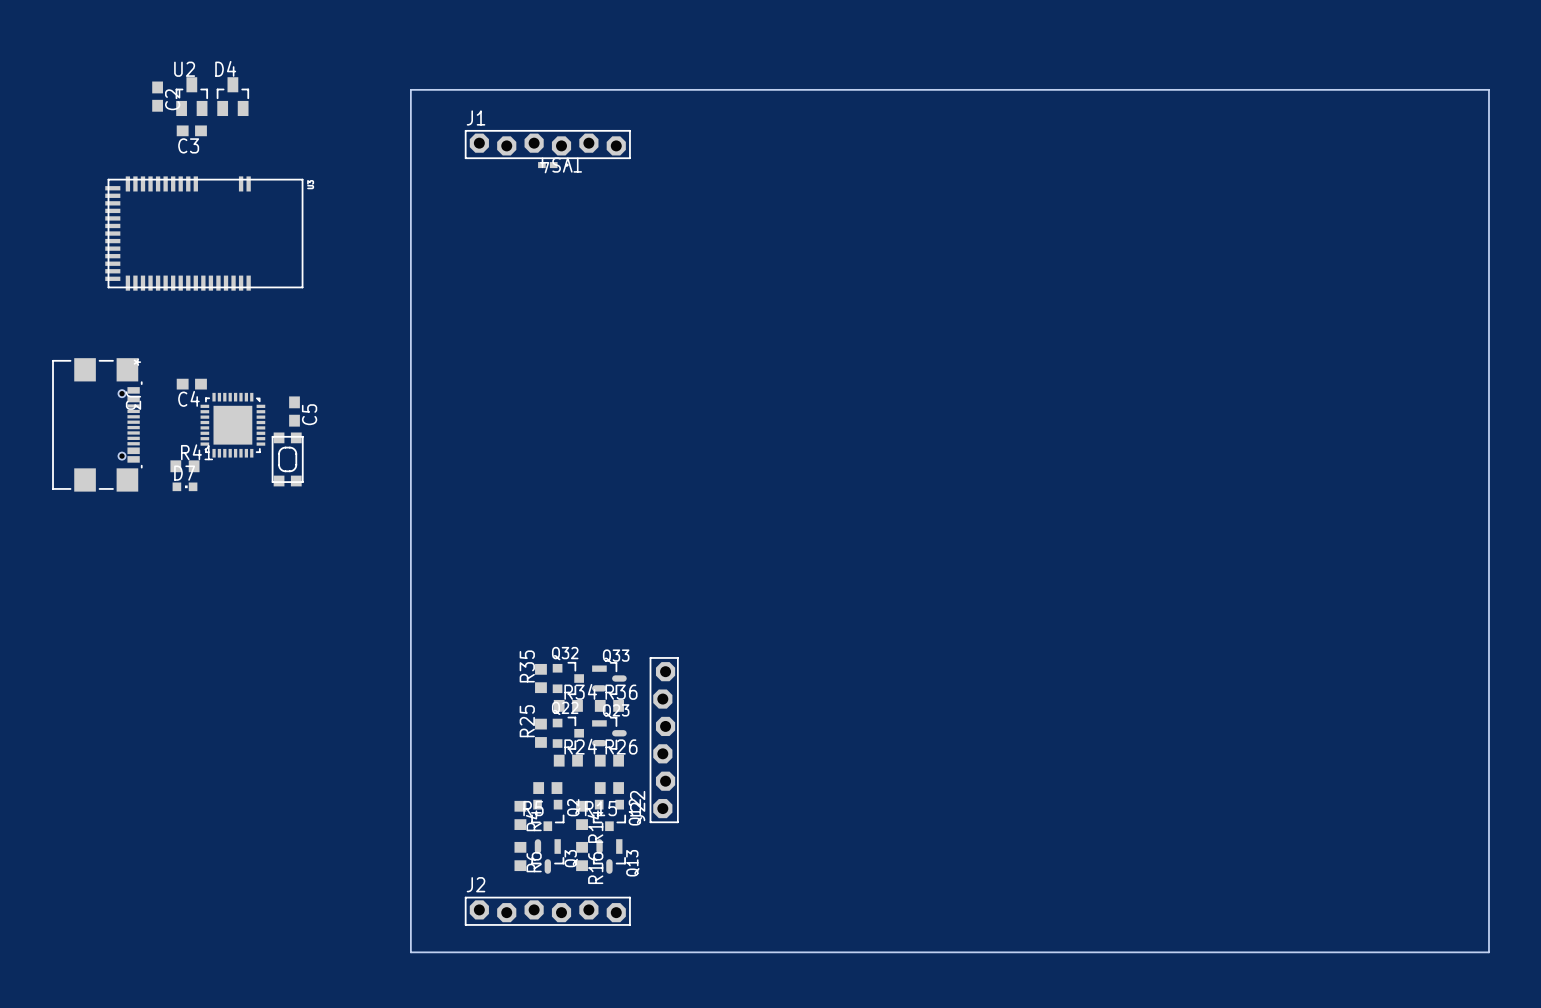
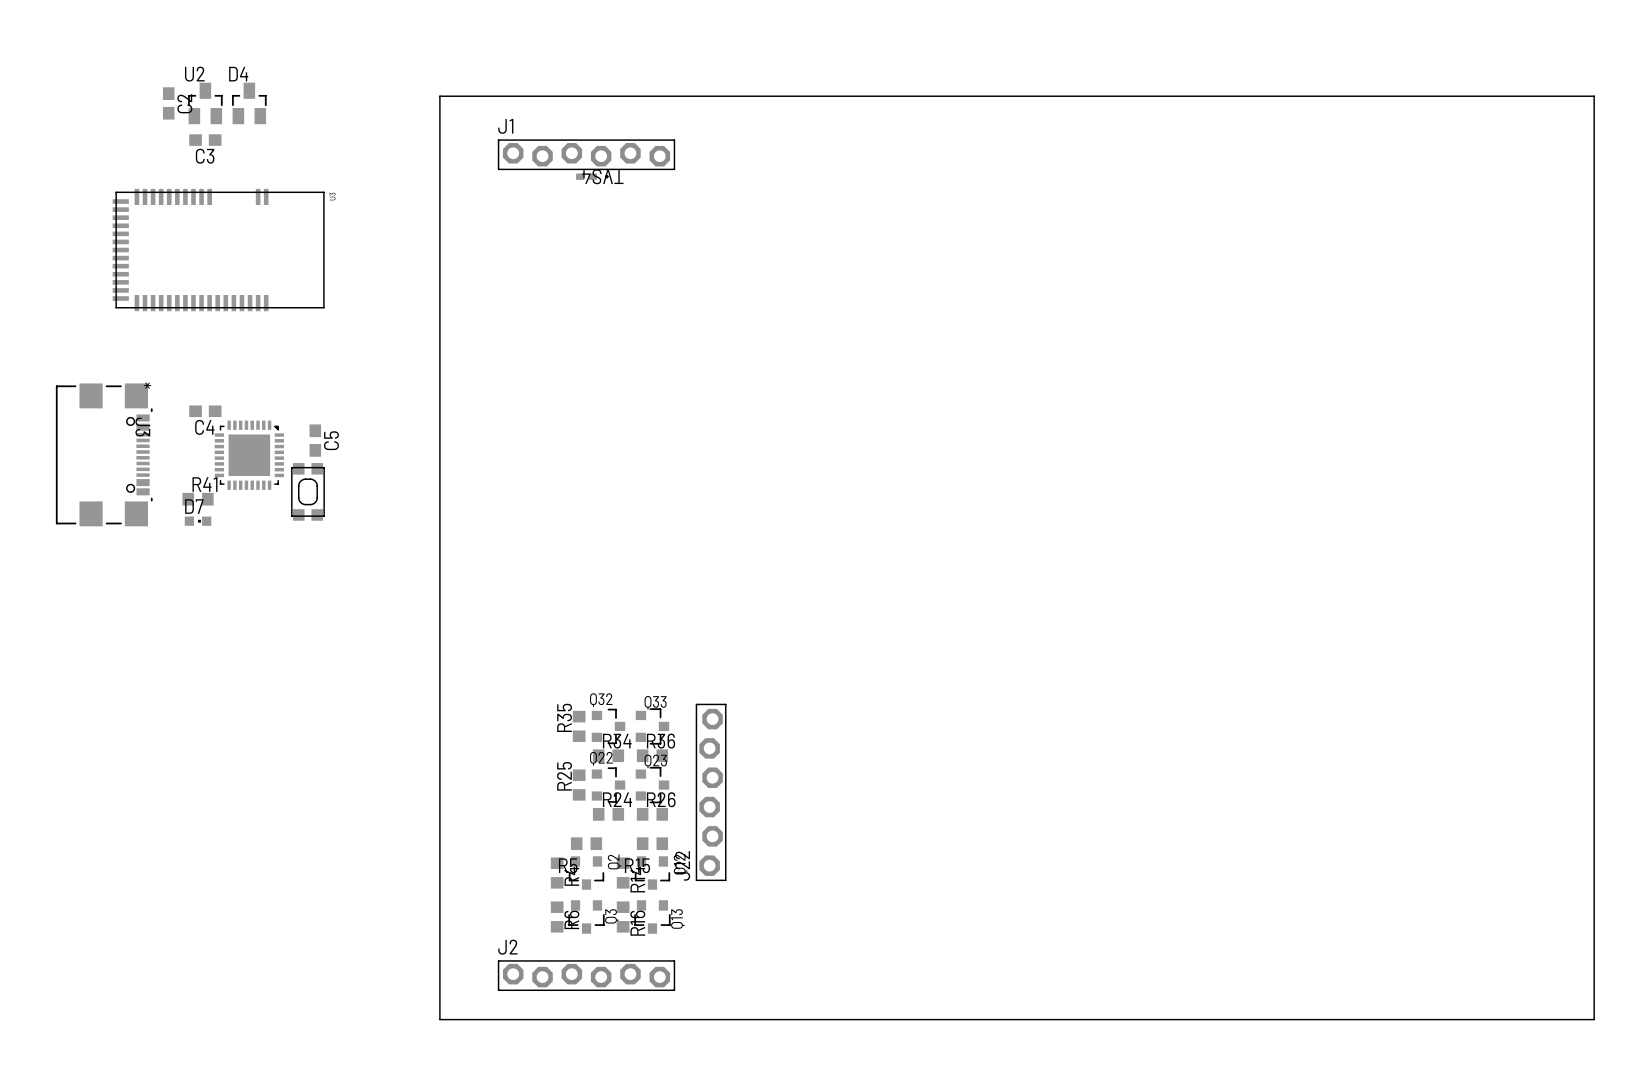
Q33 footprint: [592, 662, 627, 695] -> [635, 708, 670, 745]
Q23 footprint: [592, 716, 627, 750] -> [635, 766, 670, 804]
Q3 footprint: [531, 839, 565, 874] -> [568, 900, 605, 934]
Q13 footprint: [592, 839, 626, 874] -> [634, 900, 671, 934]

